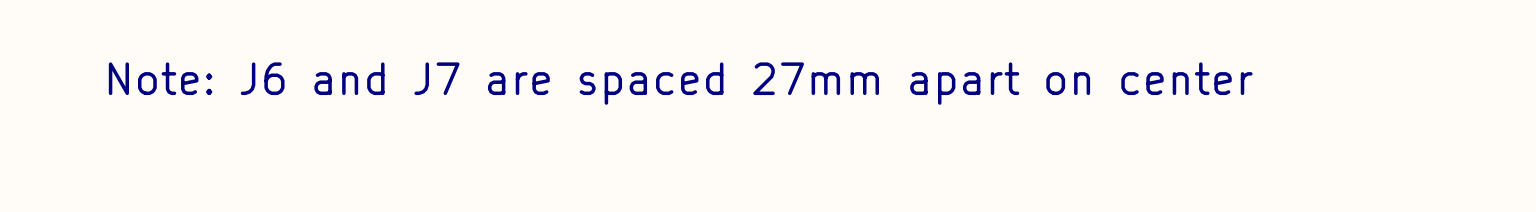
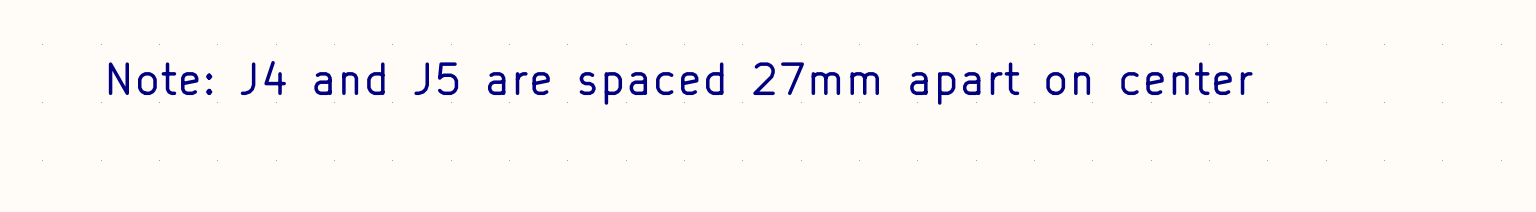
text: Note: J6 and J7 are spaced 27mm apart on center (680, 83) -> Note: J4 and J5 are spaced 27mm apart on center (680, 82)

